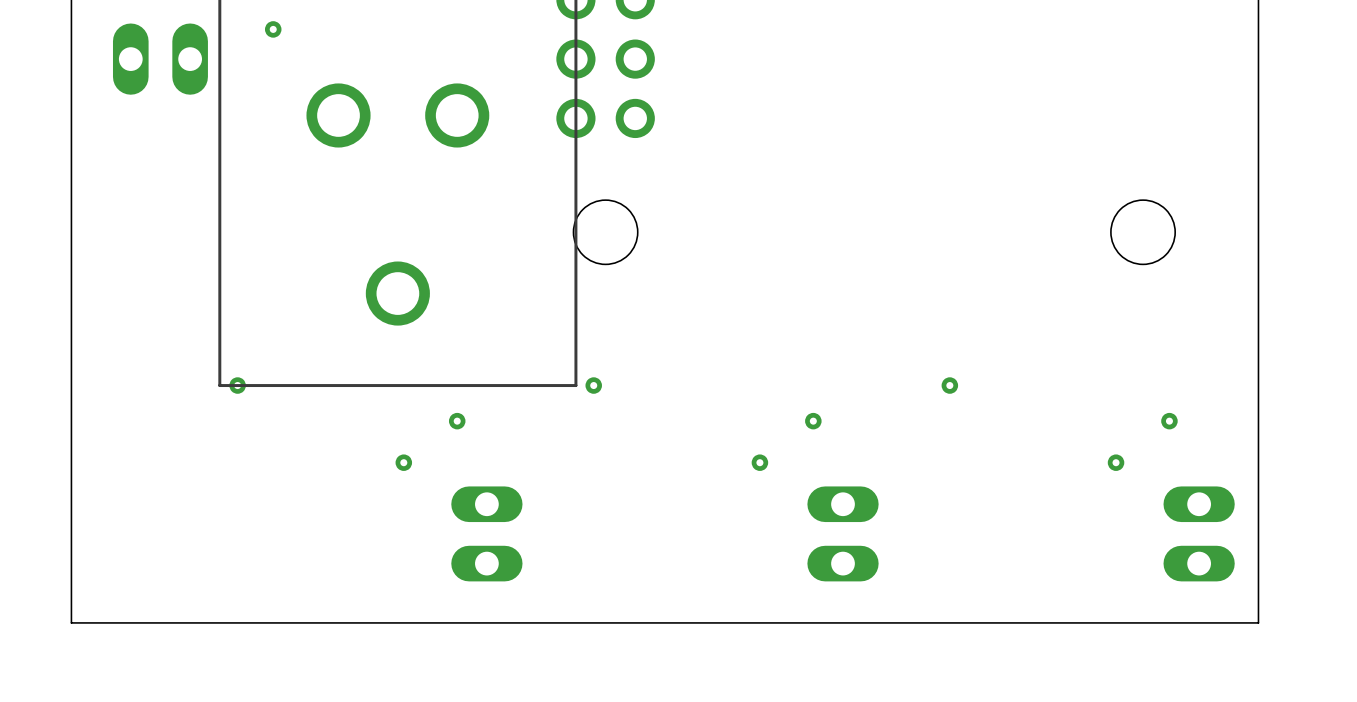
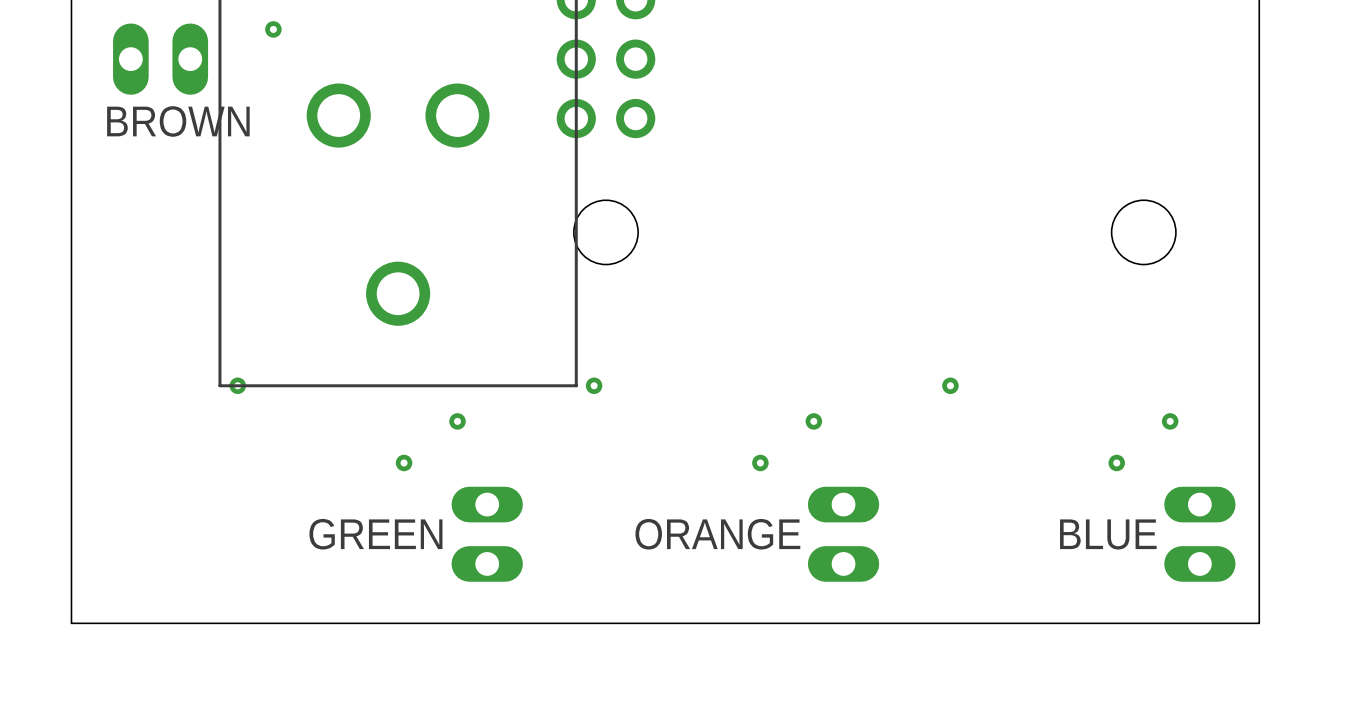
text: none -> BROWN (178, 121)
text: none -> GREEN (375, 534)
text: none -> ORANGE (717, 534)
text: none -> BLUE (1108, 534)

